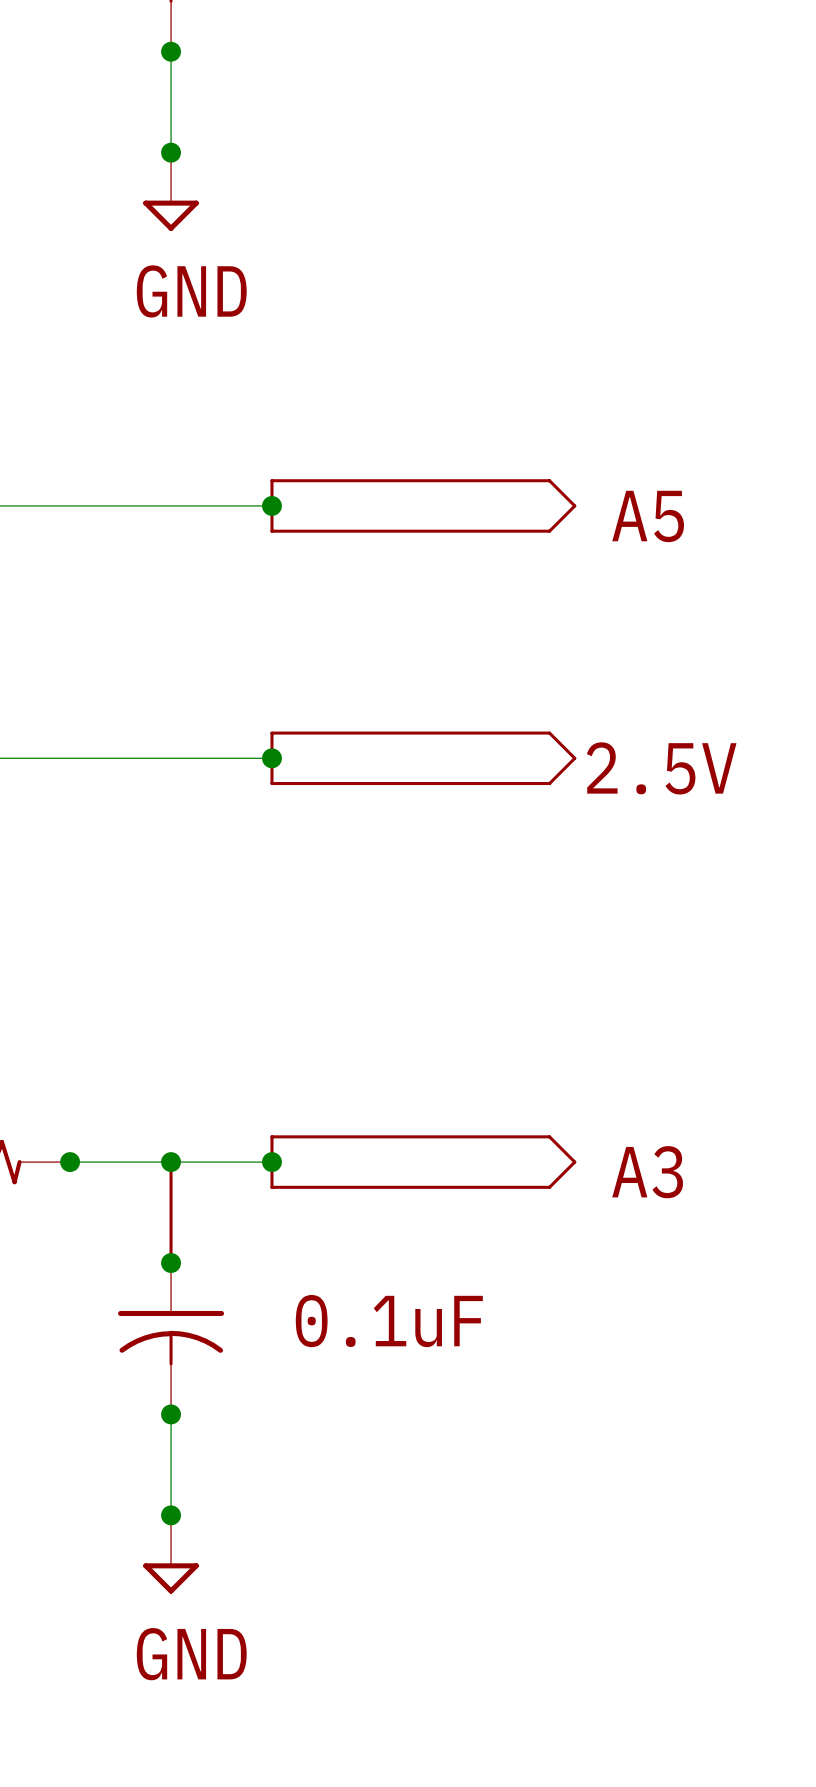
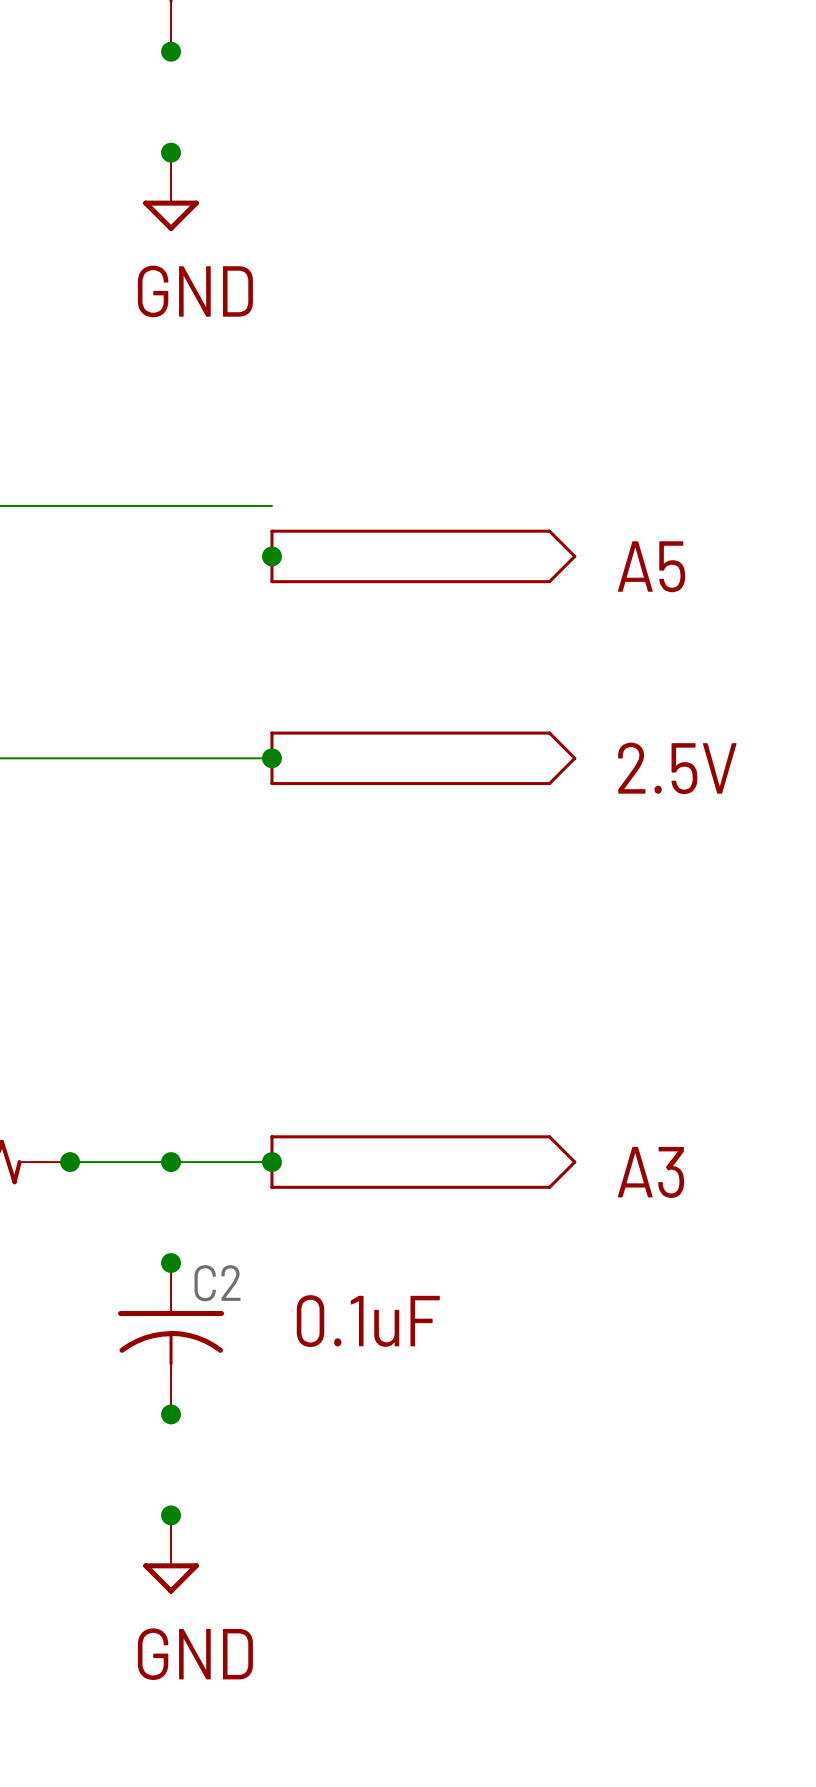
wire: (171, 51) (171, 152) -> none
junction position: (271, 505) -> (271, 556)
part position: (423, 505) -> (423, 556)
line: (171, 1162) (171, 1263) -> none
C2 name: none -> C2 (217, 1283)
wire: (171, 1414) (171, 1515) -> none

